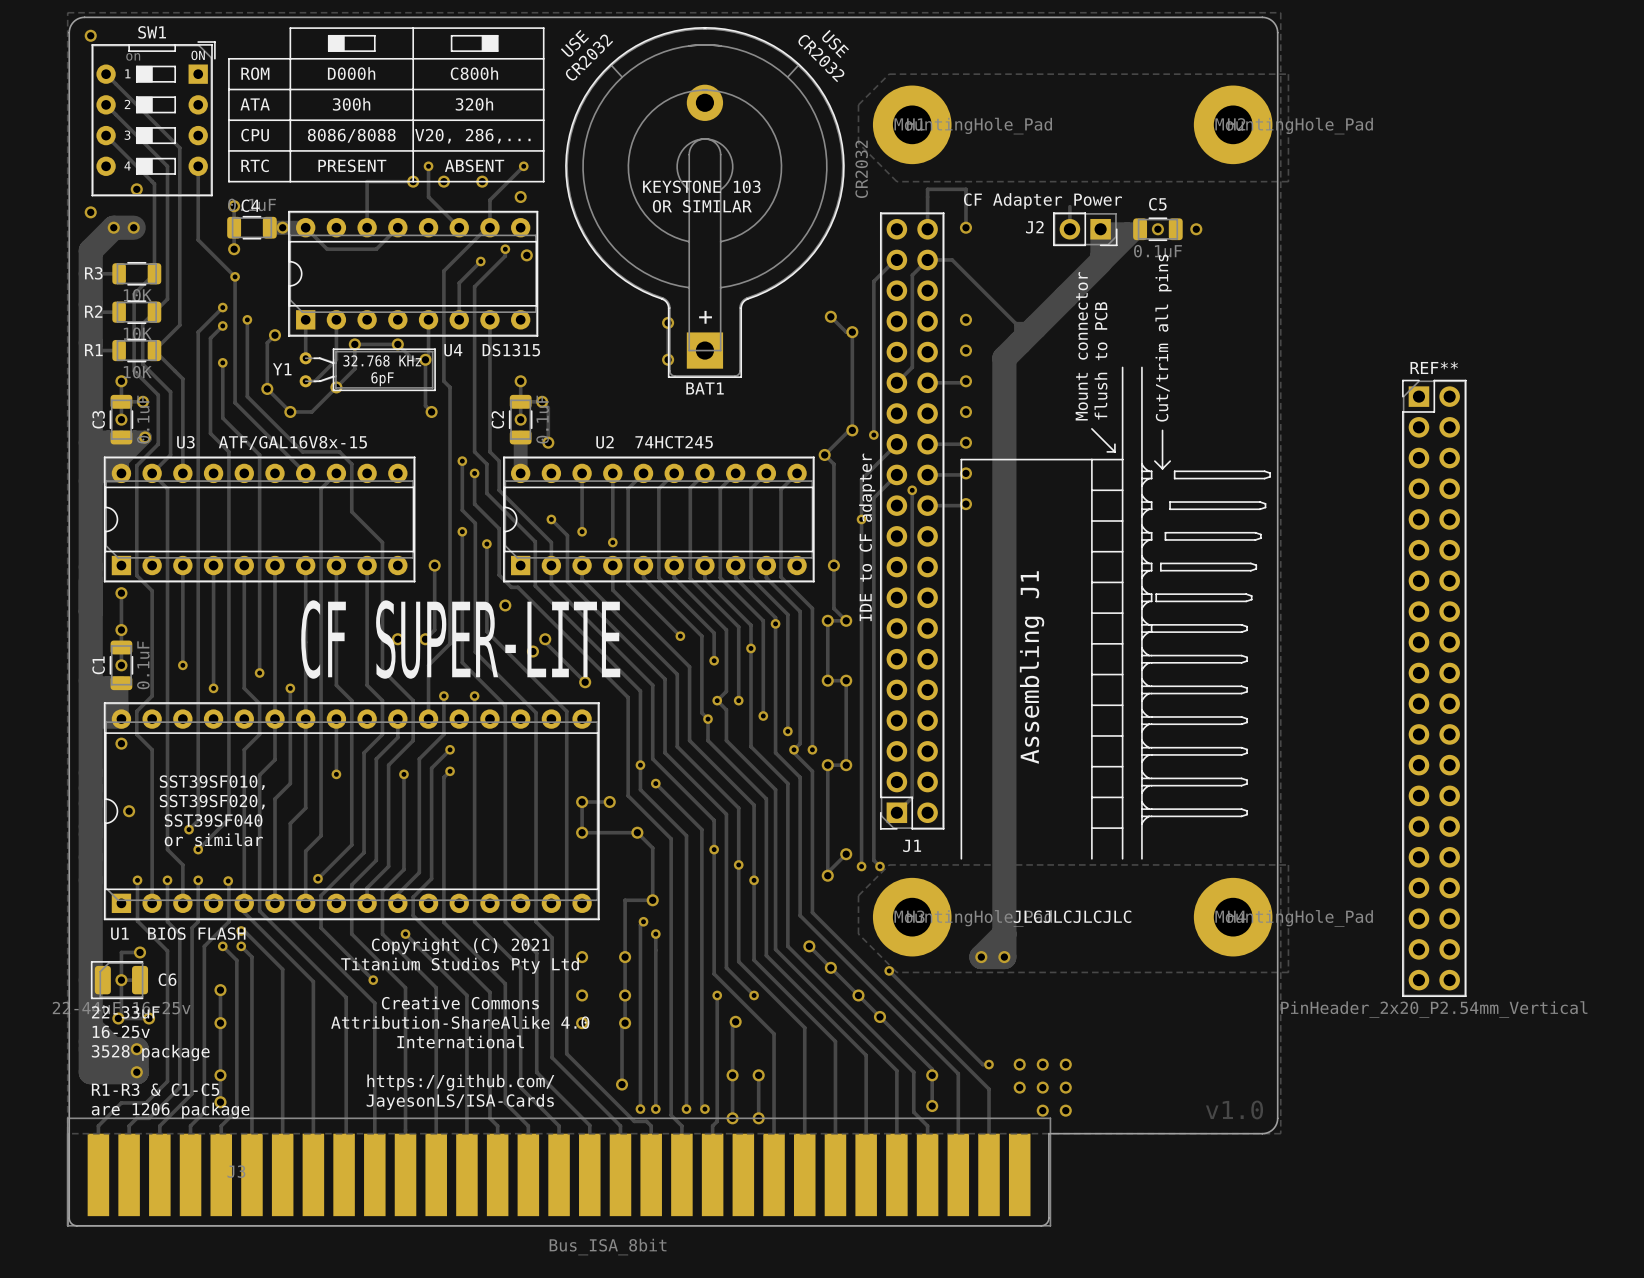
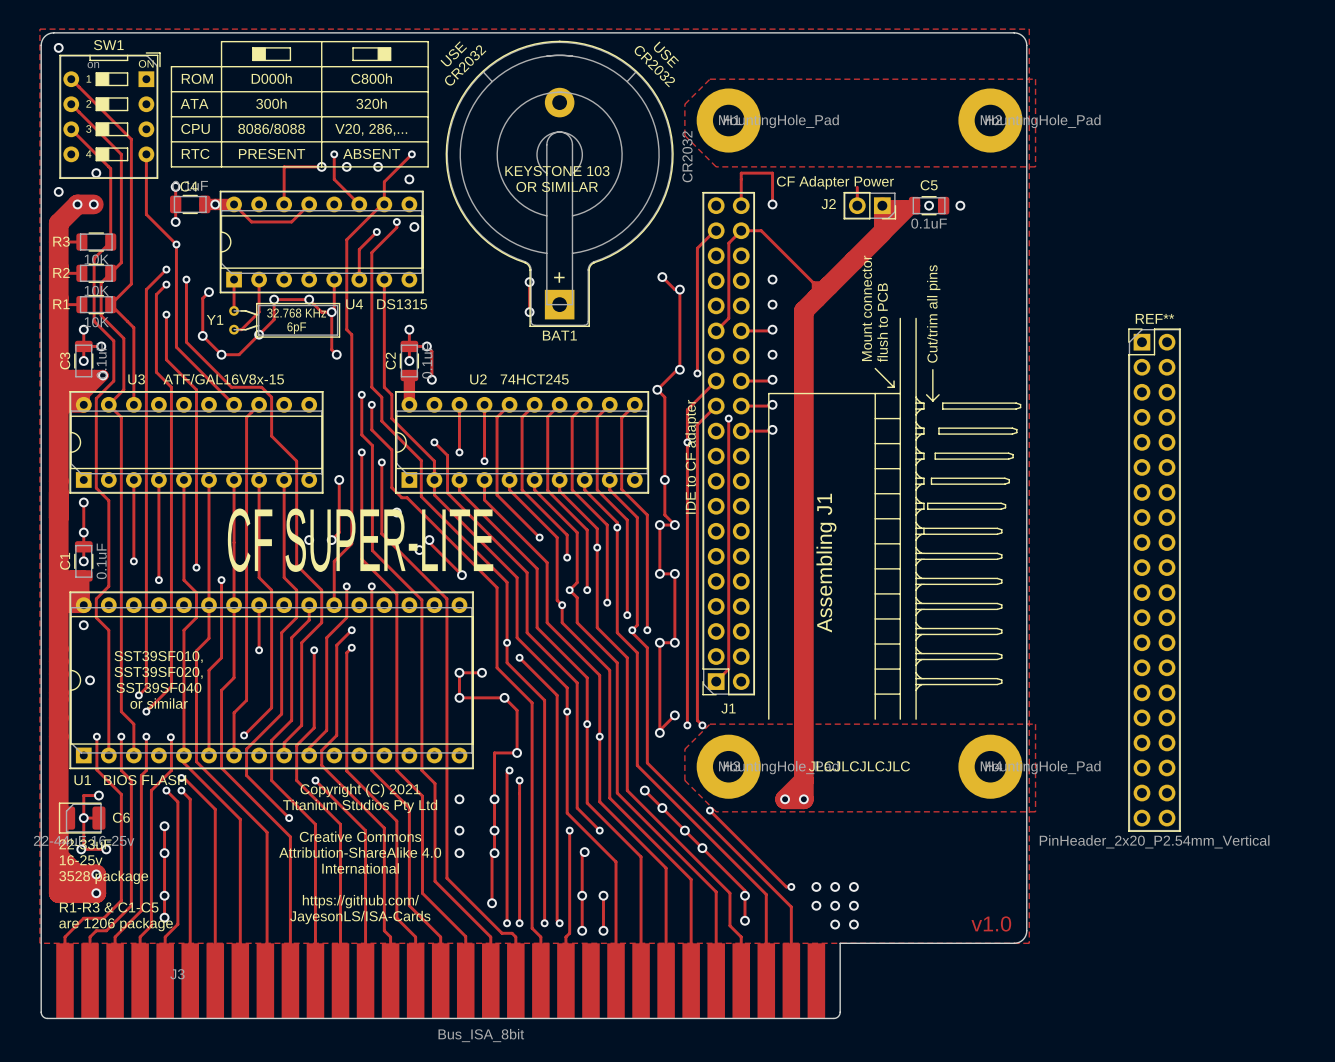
J3 footprint: [67, 1117, 1052, 1227] -> [56, 943, 826, 1019]

